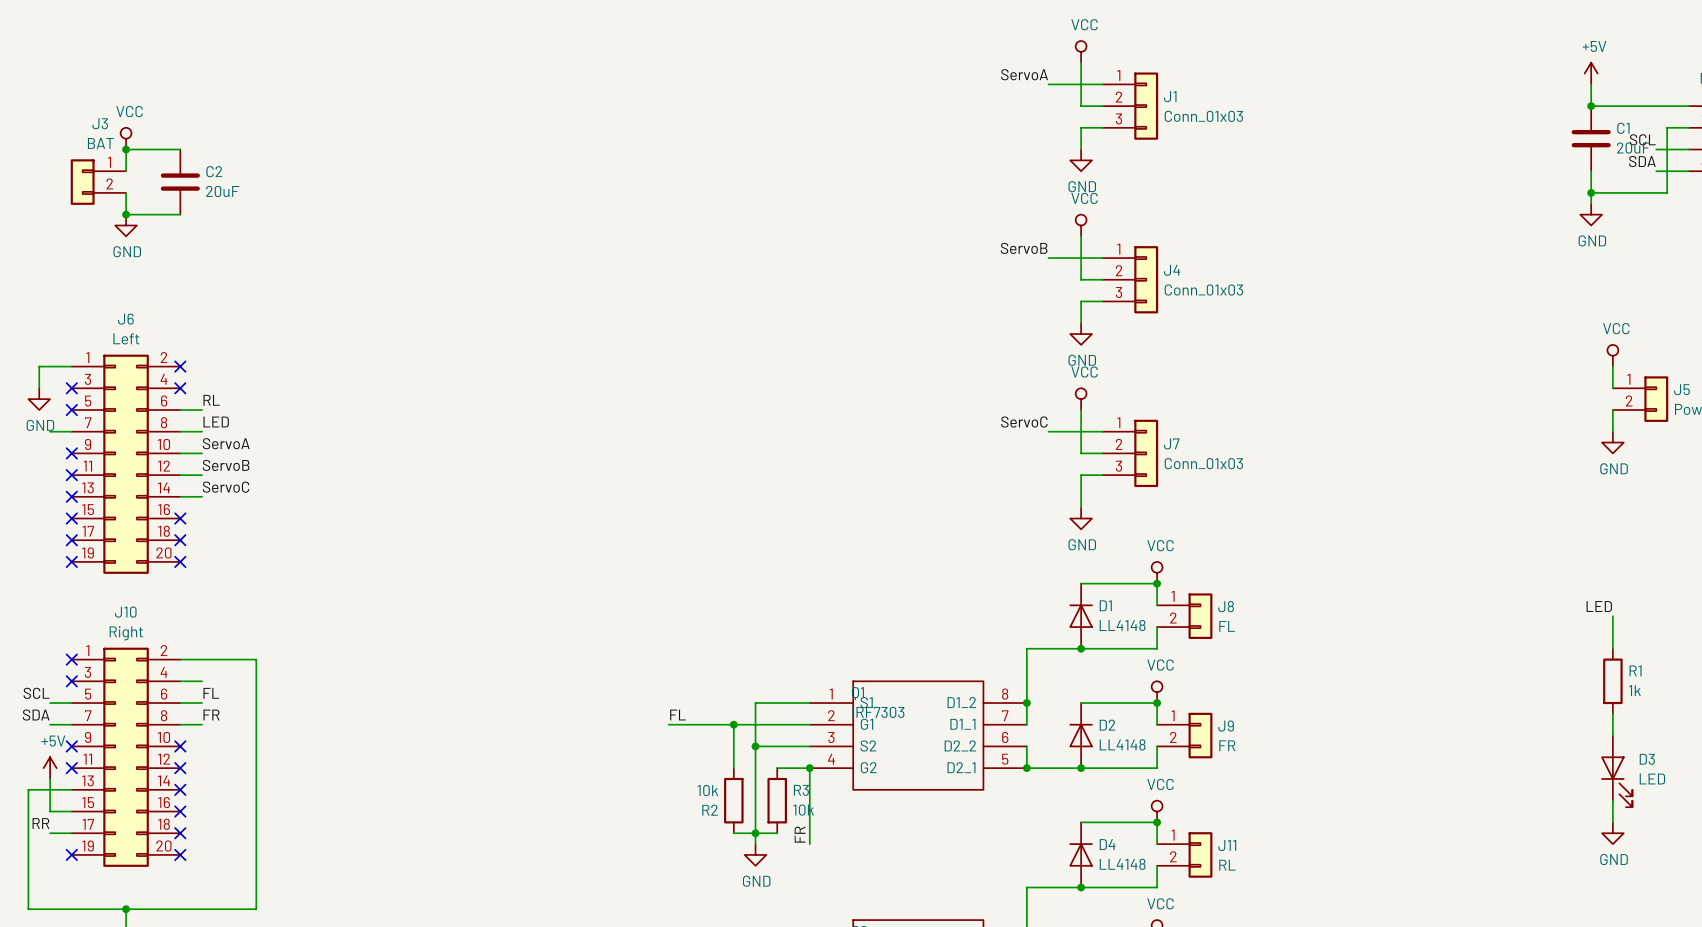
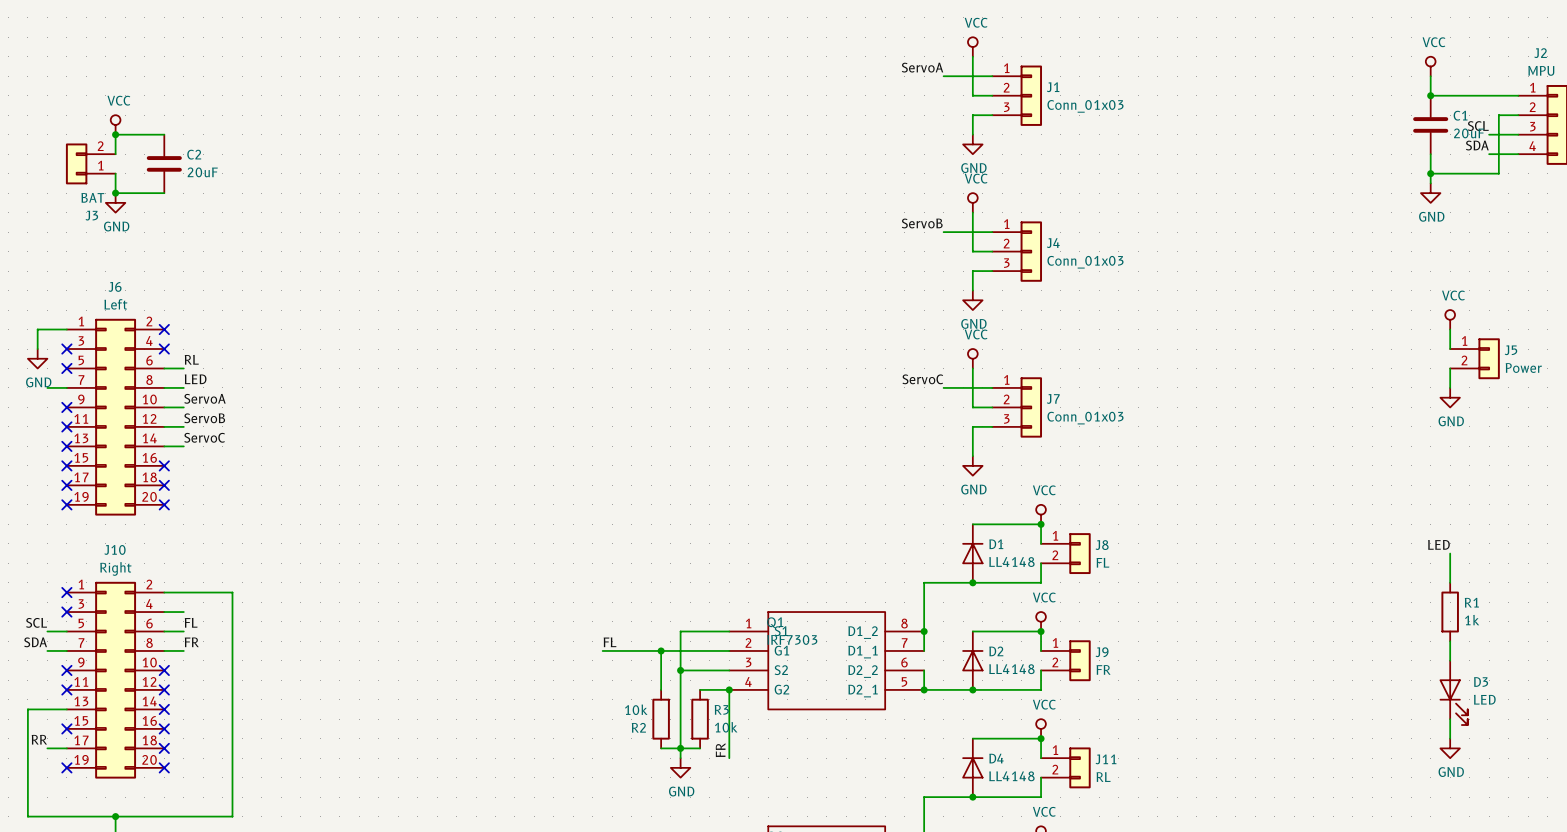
power symbol: +5V (1591, 73) -> VCC (1430, 66)
J3 flip: as is (82, 182) -> up-down (76, 163)
power symbol: +5V (50, 768) -> none
wire: (50, 778) (50, 811) (71, 811) -> none
no-connect mark: none -> (66, 728)

